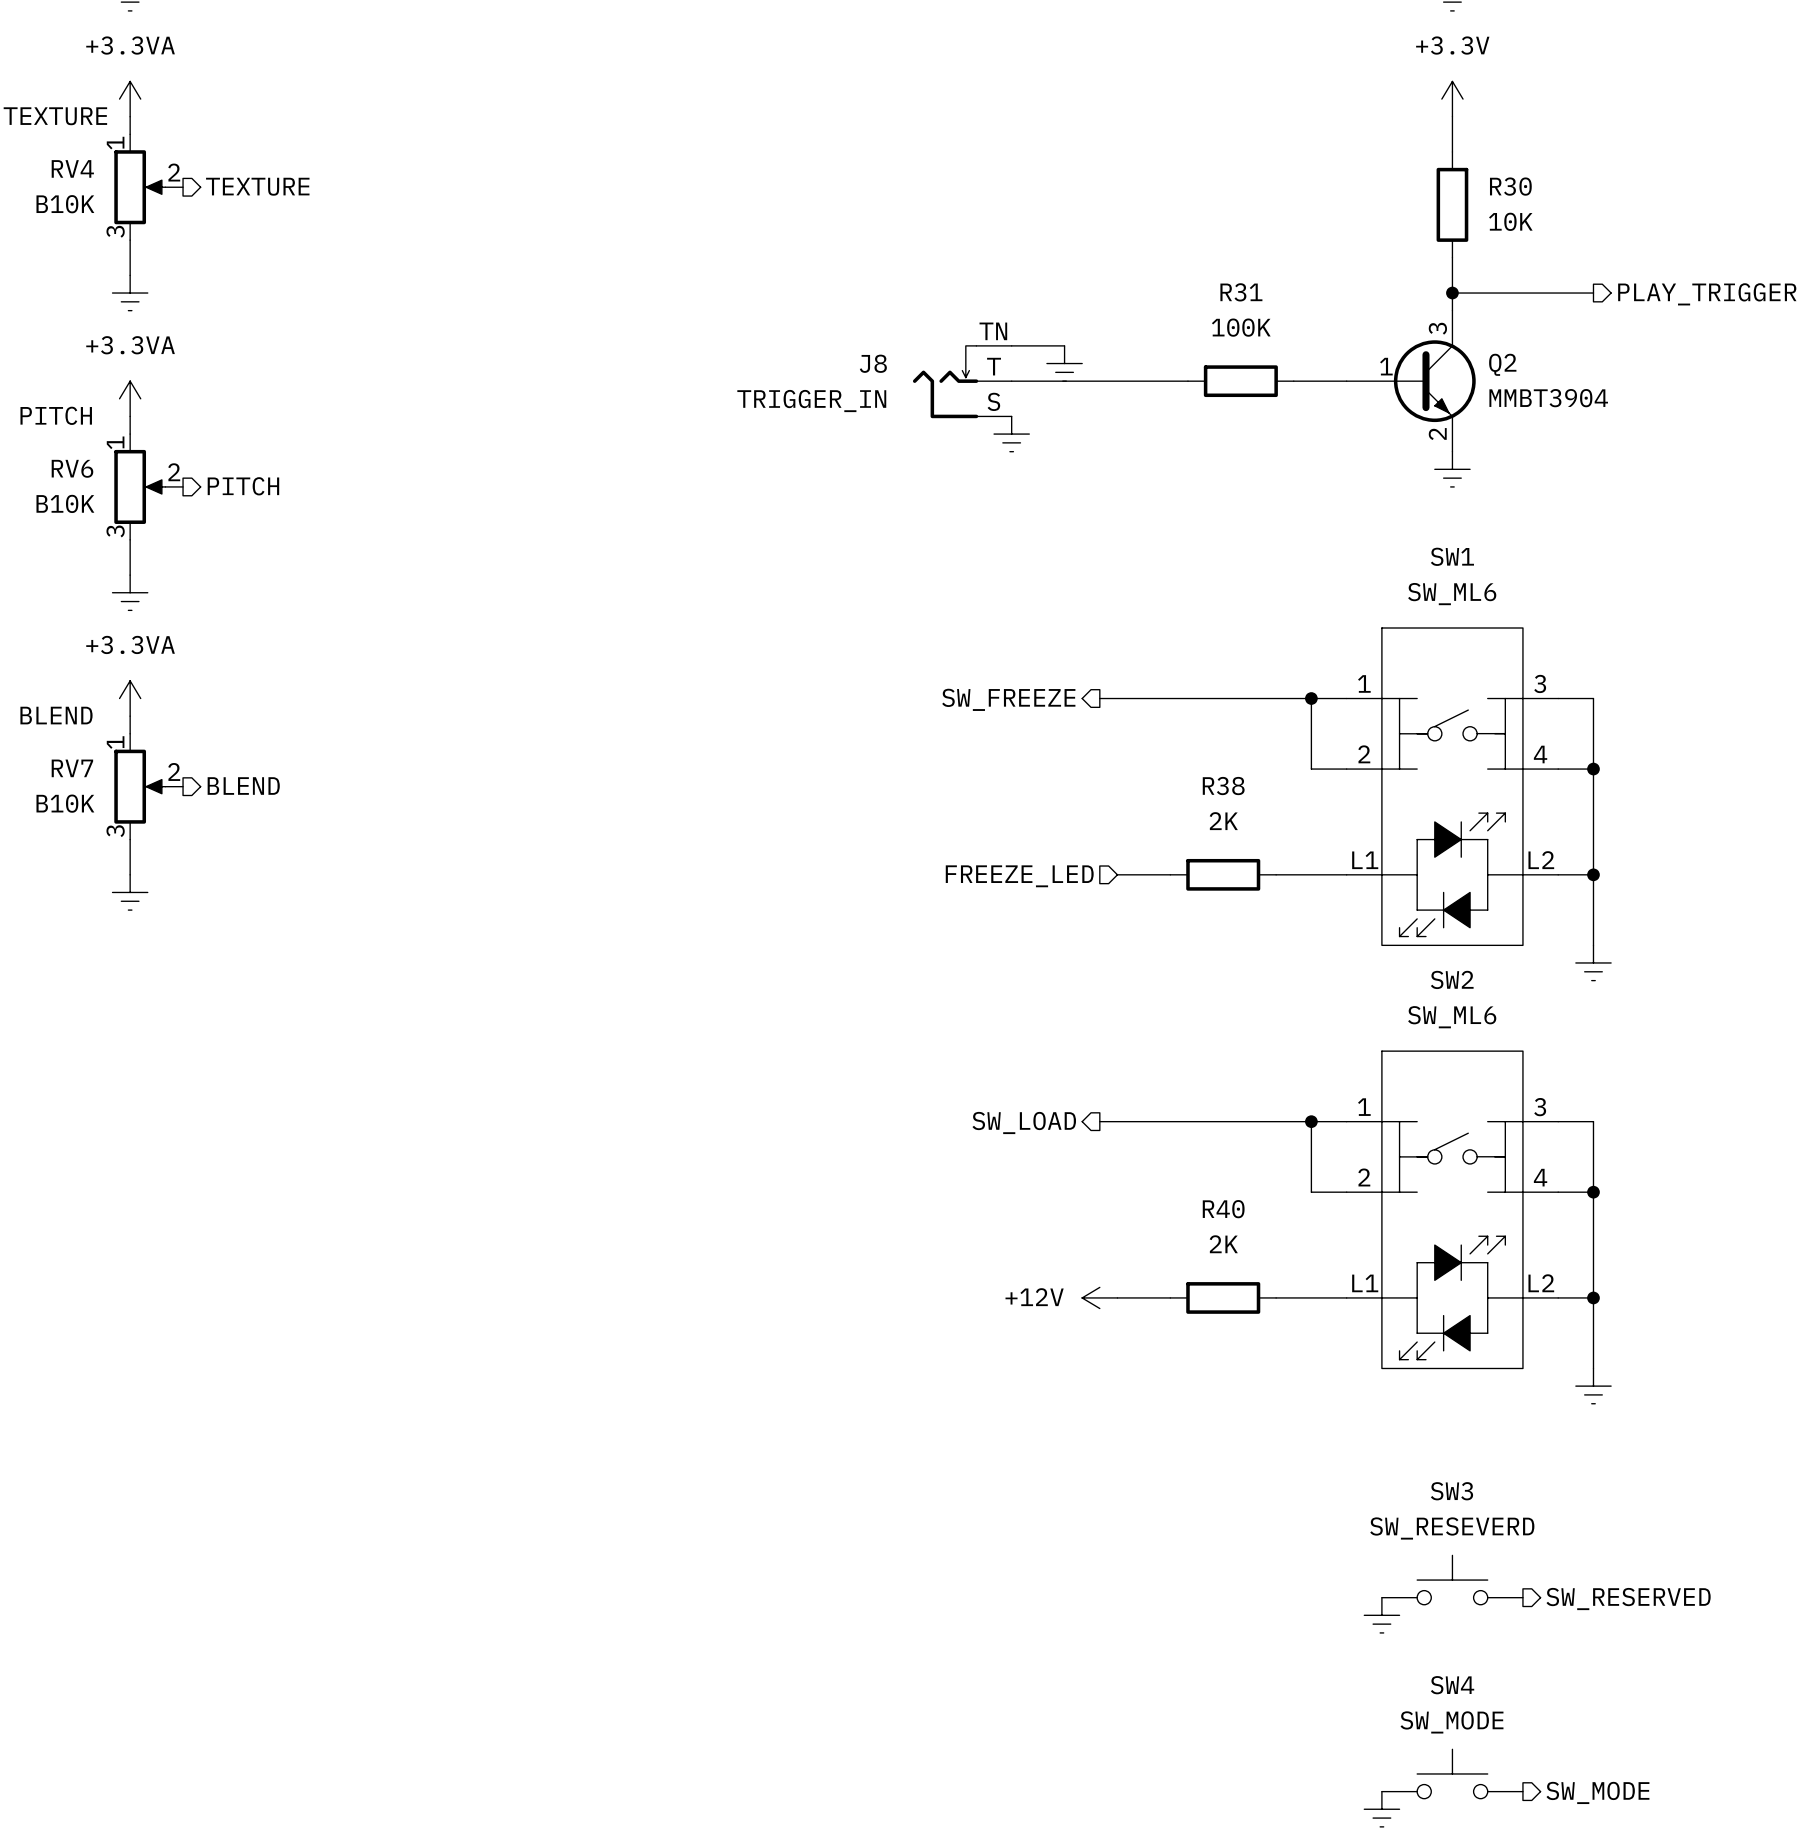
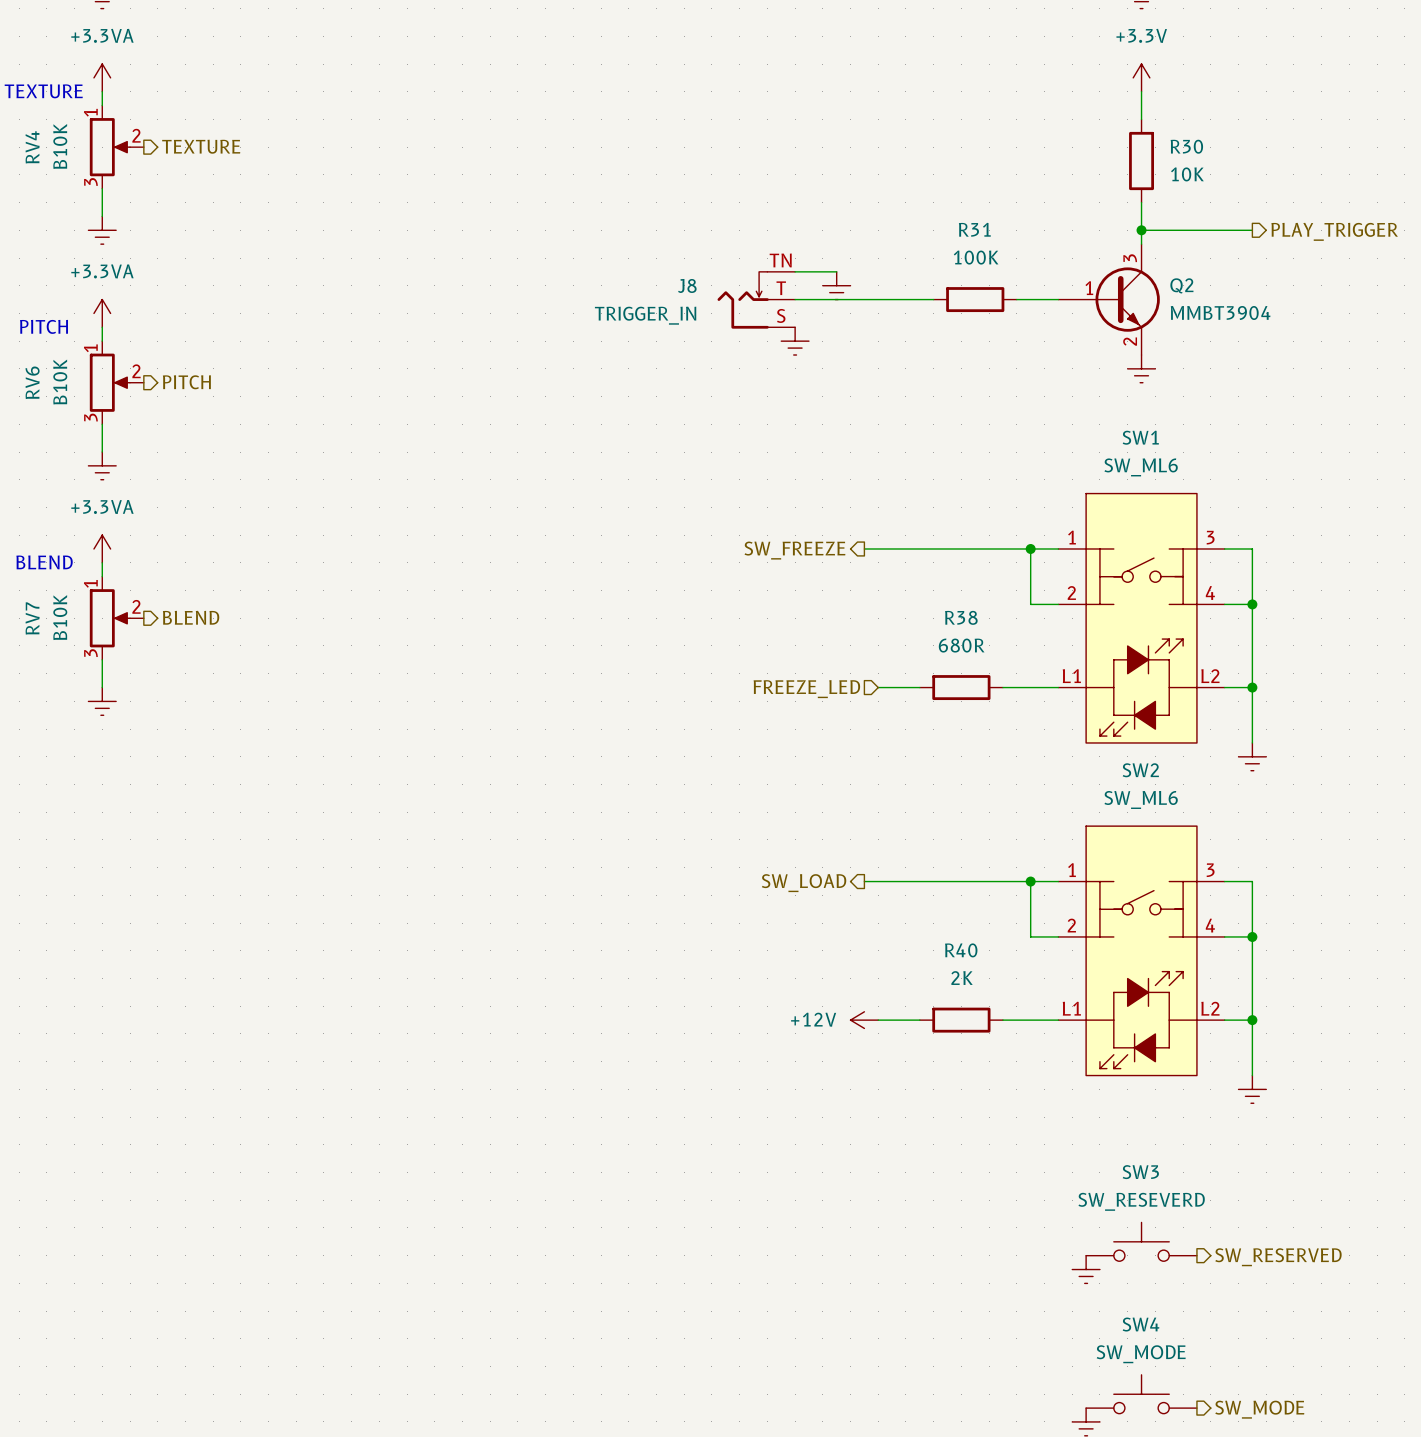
RV4 name rotation: 0° (72, 168) -> 90° counterclockwise (32, 147)
RV4 value rotation: 0° (65, 204) -> 90° counterclockwise (60, 146)
RV6 name rotation: 0° (72, 468) -> 90° counterclockwise (32, 382)
RV6 value rotation: 0° (65, 503) -> 90° counterclockwise (60, 382)
RV7 name rotation: 0° (72, 768) -> 90° counterclockwise (32, 618)
RV7 value rotation: 0° (65, 803) -> 90° counterclockwise (60, 617)
R38 value: 2K (1223, 821) -> 680R (961, 645)

